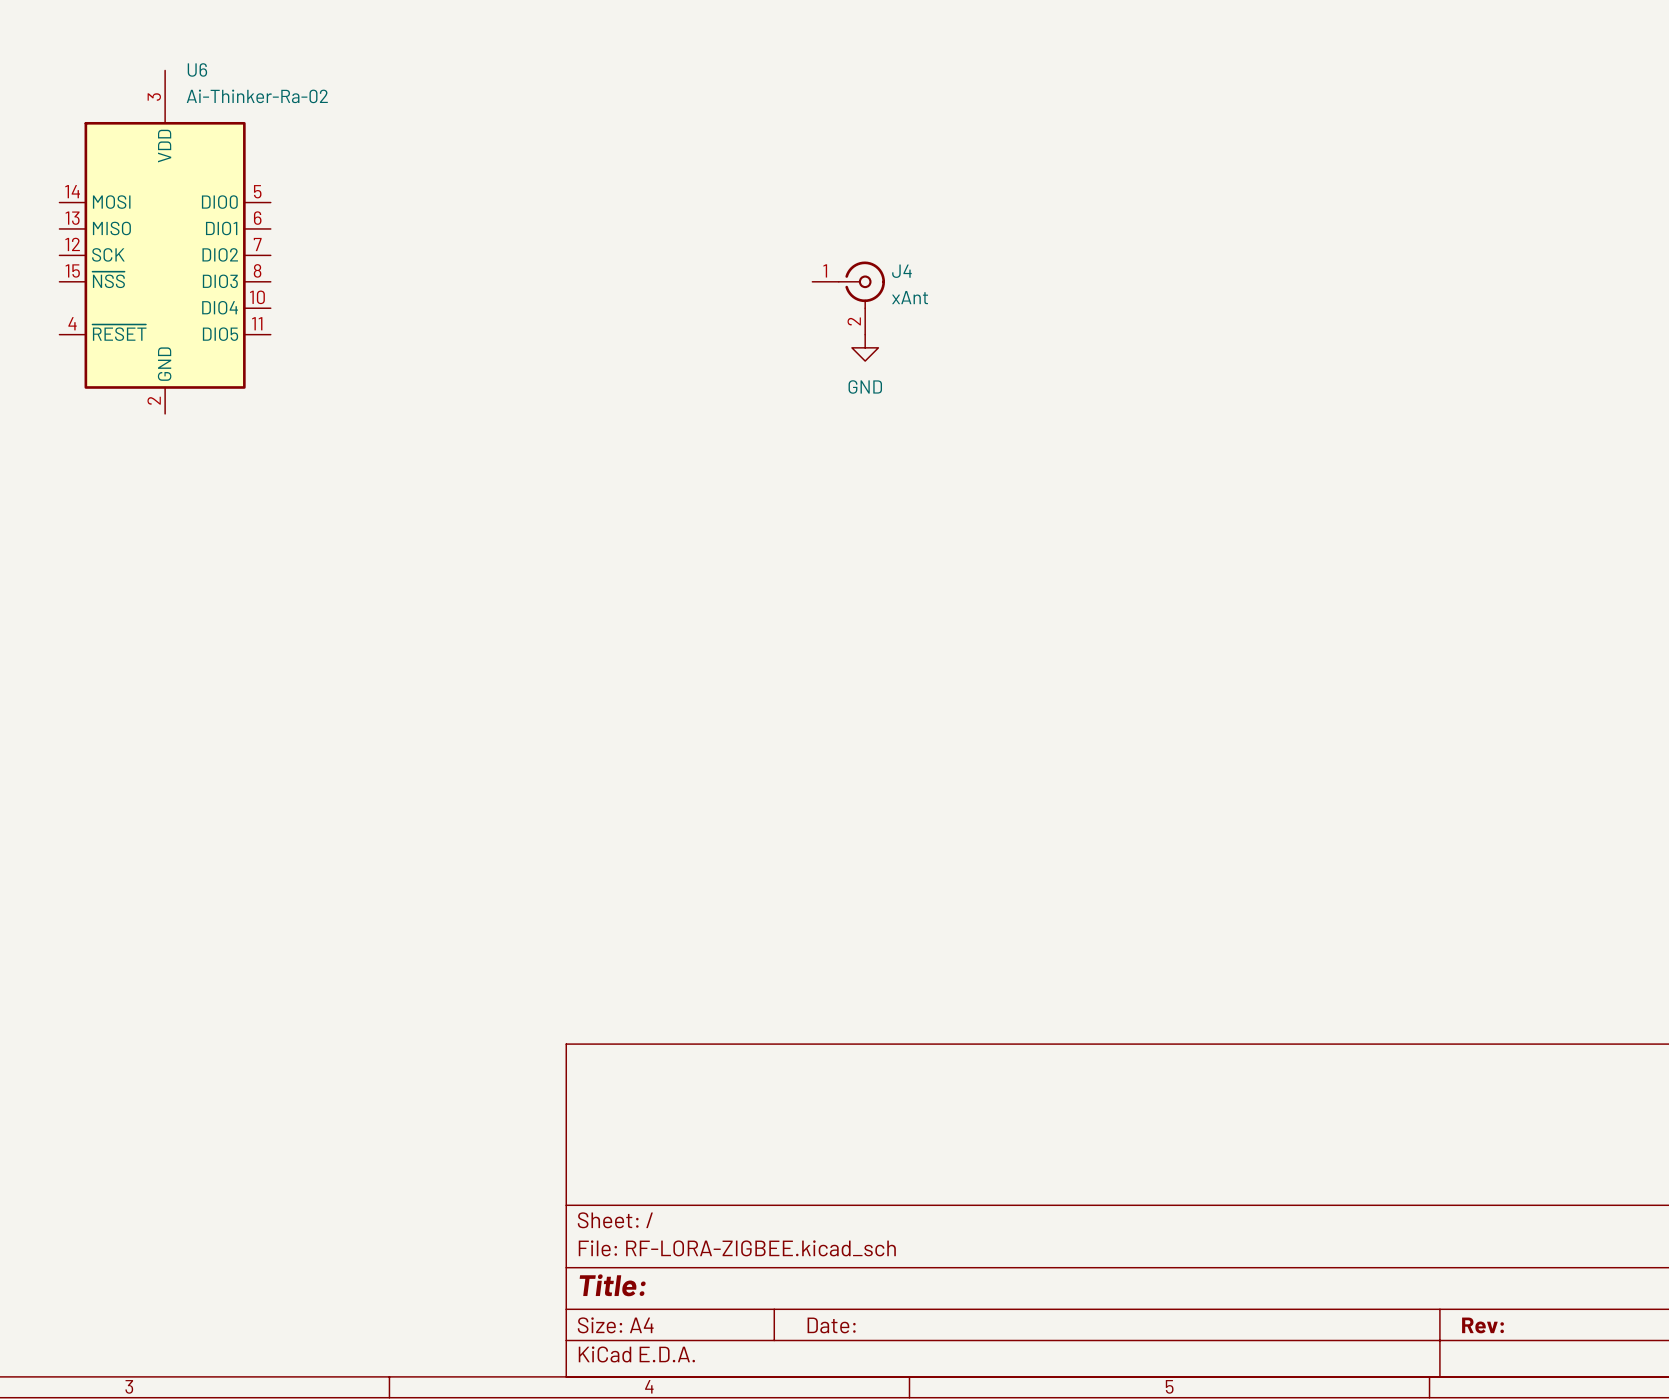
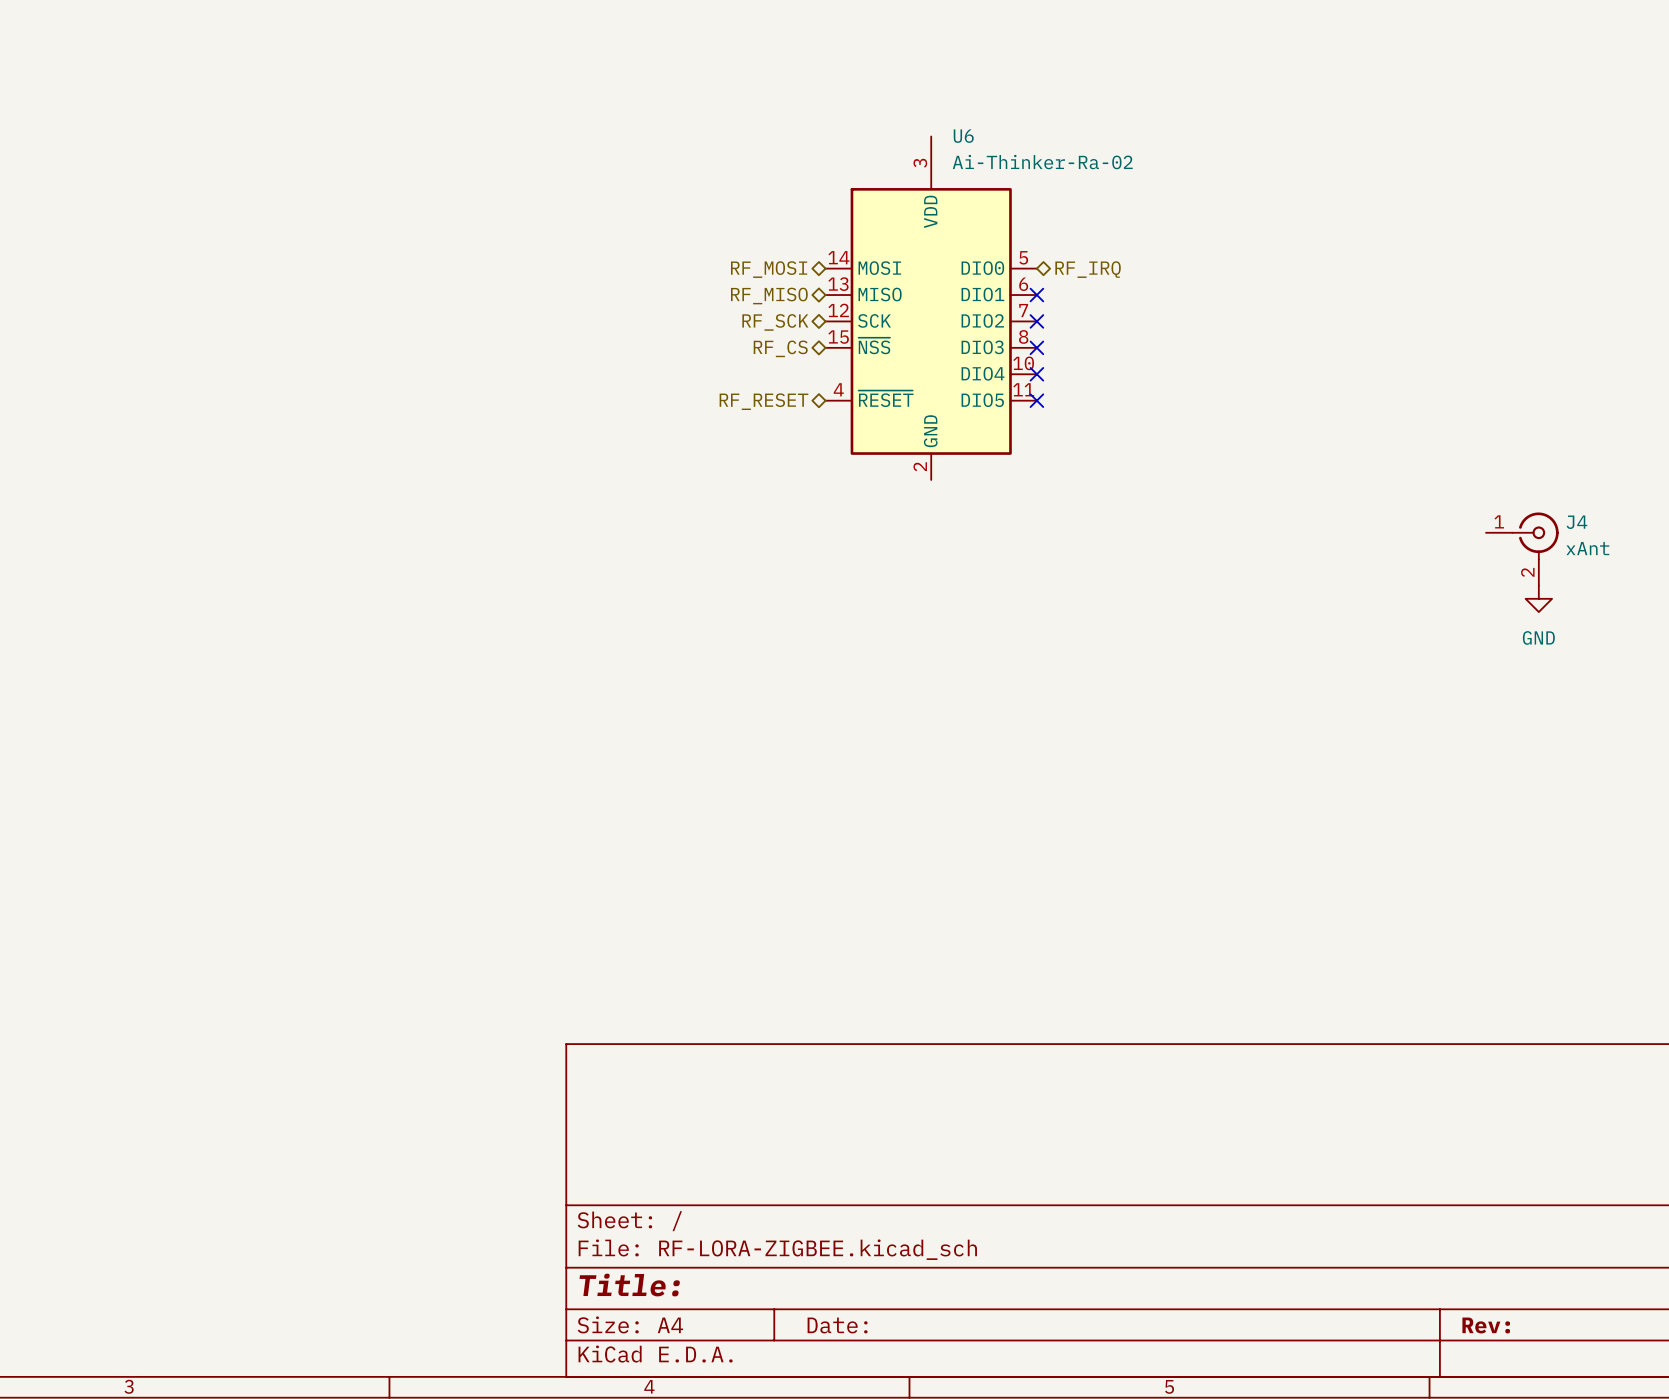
U6 position: (165, 242) -> (931, 308)
hierarchical label: none -> RF_MOSI (769, 269)
hierarchical label: none -> RF_IRQ (1088, 269)
hierarchical label: none -> RF_MISO (769, 296)
no-connect mark: none -> (1036, 295)
J4 position: (848, 298) -> (1522, 549)
hierarchical label: none -> RF_SCK (775, 322)
no-connect mark: none -> (1036, 321)
hierarchical label: none -> RF_CS (780, 348)
power symbol: GND (865, 347) -> none
no-connect mark: none -> (1036, 347)
no-connect mark: none -> (1036, 374)
hierarchical label: none -> RF_RESET (763, 401)
no-connect mark: none -> (1036, 400)
power symbol: none -> GND (1538, 598)

